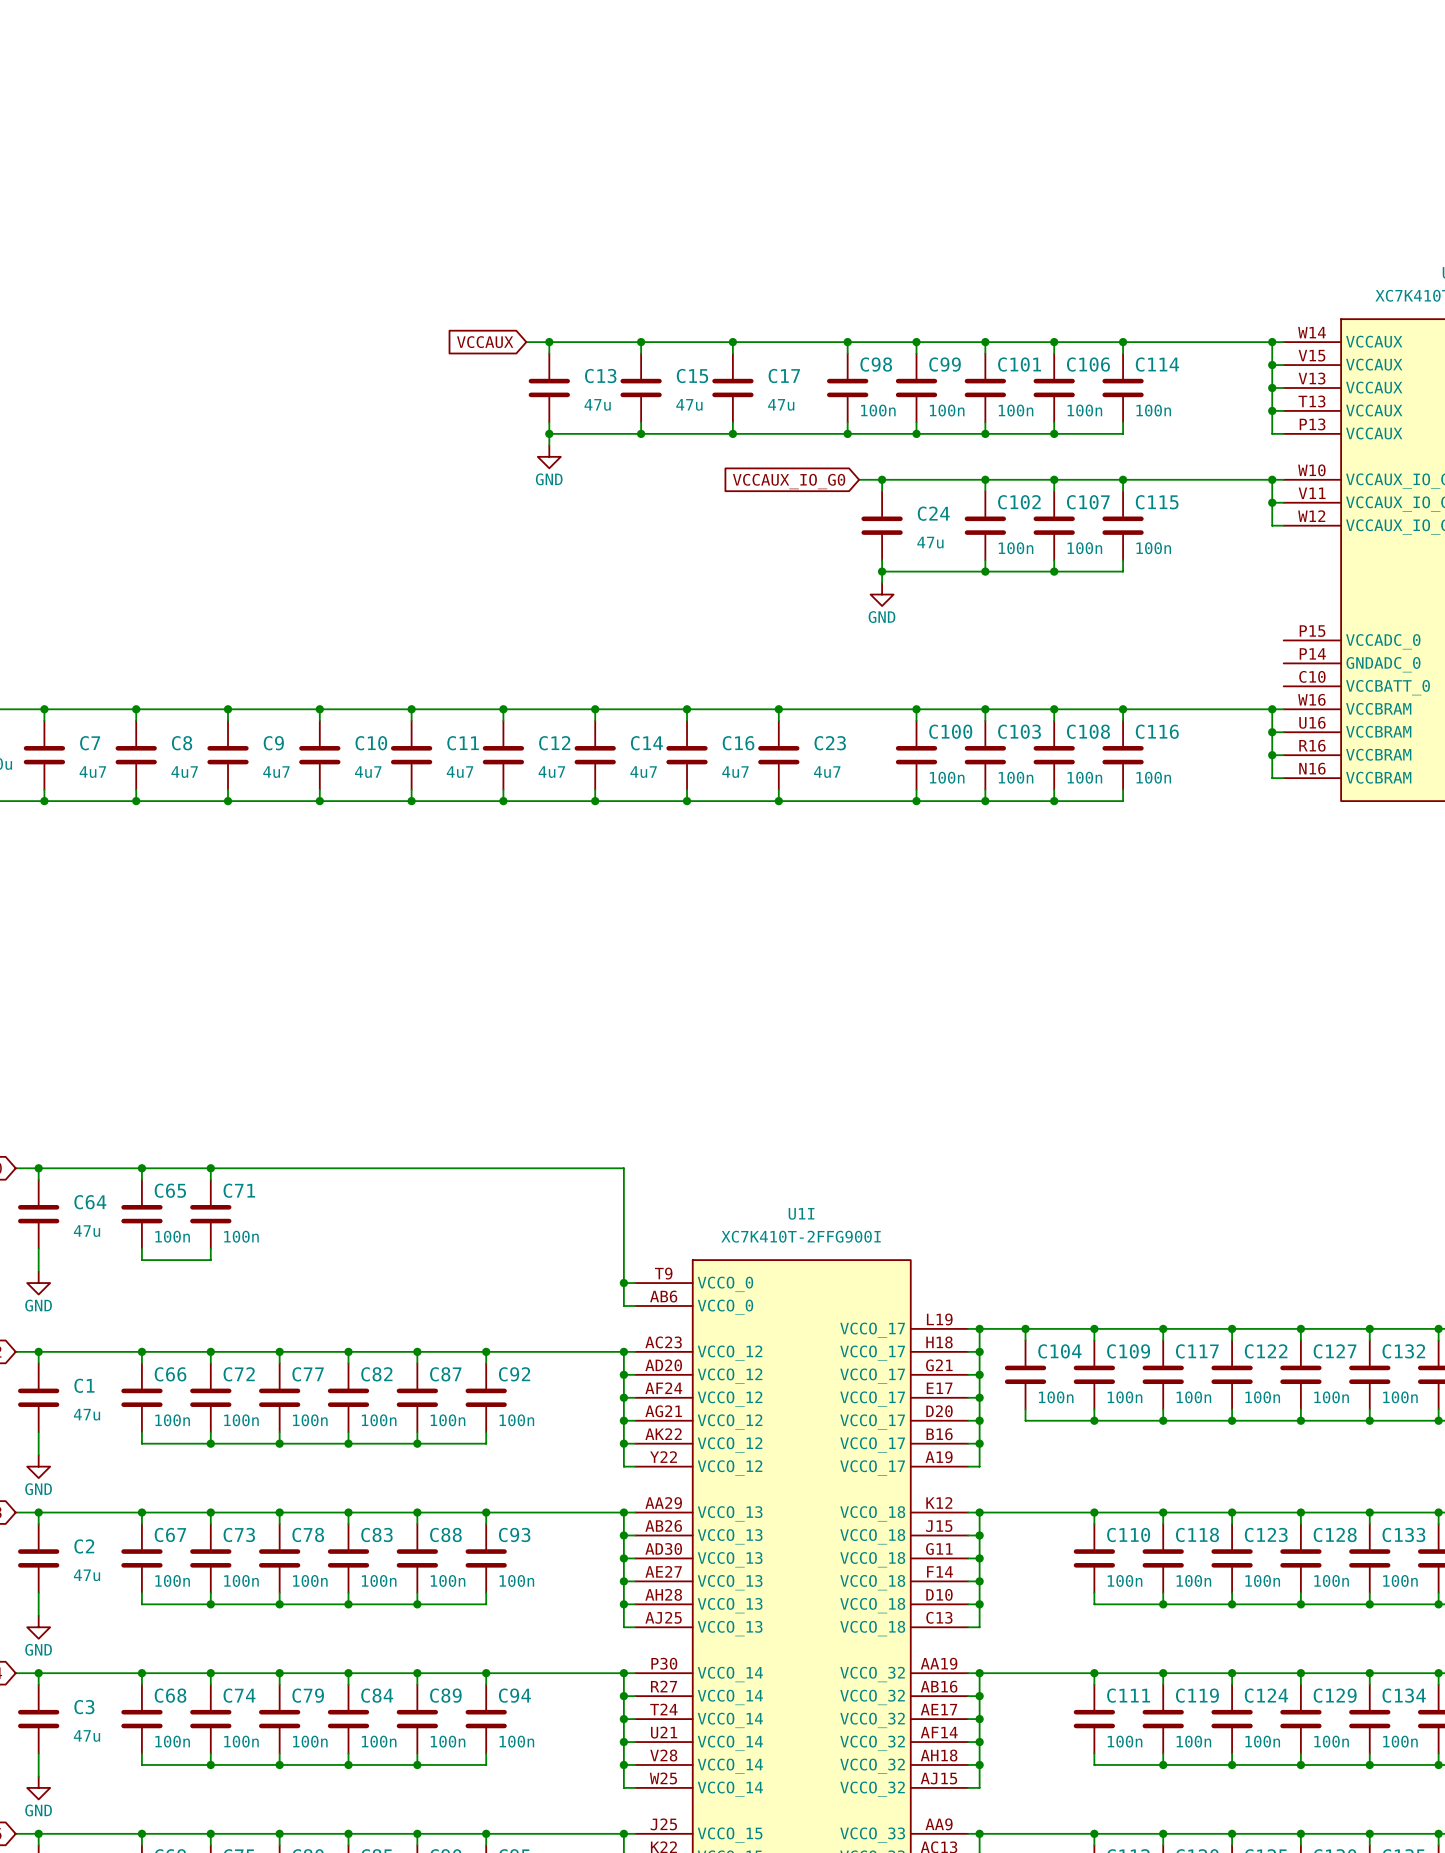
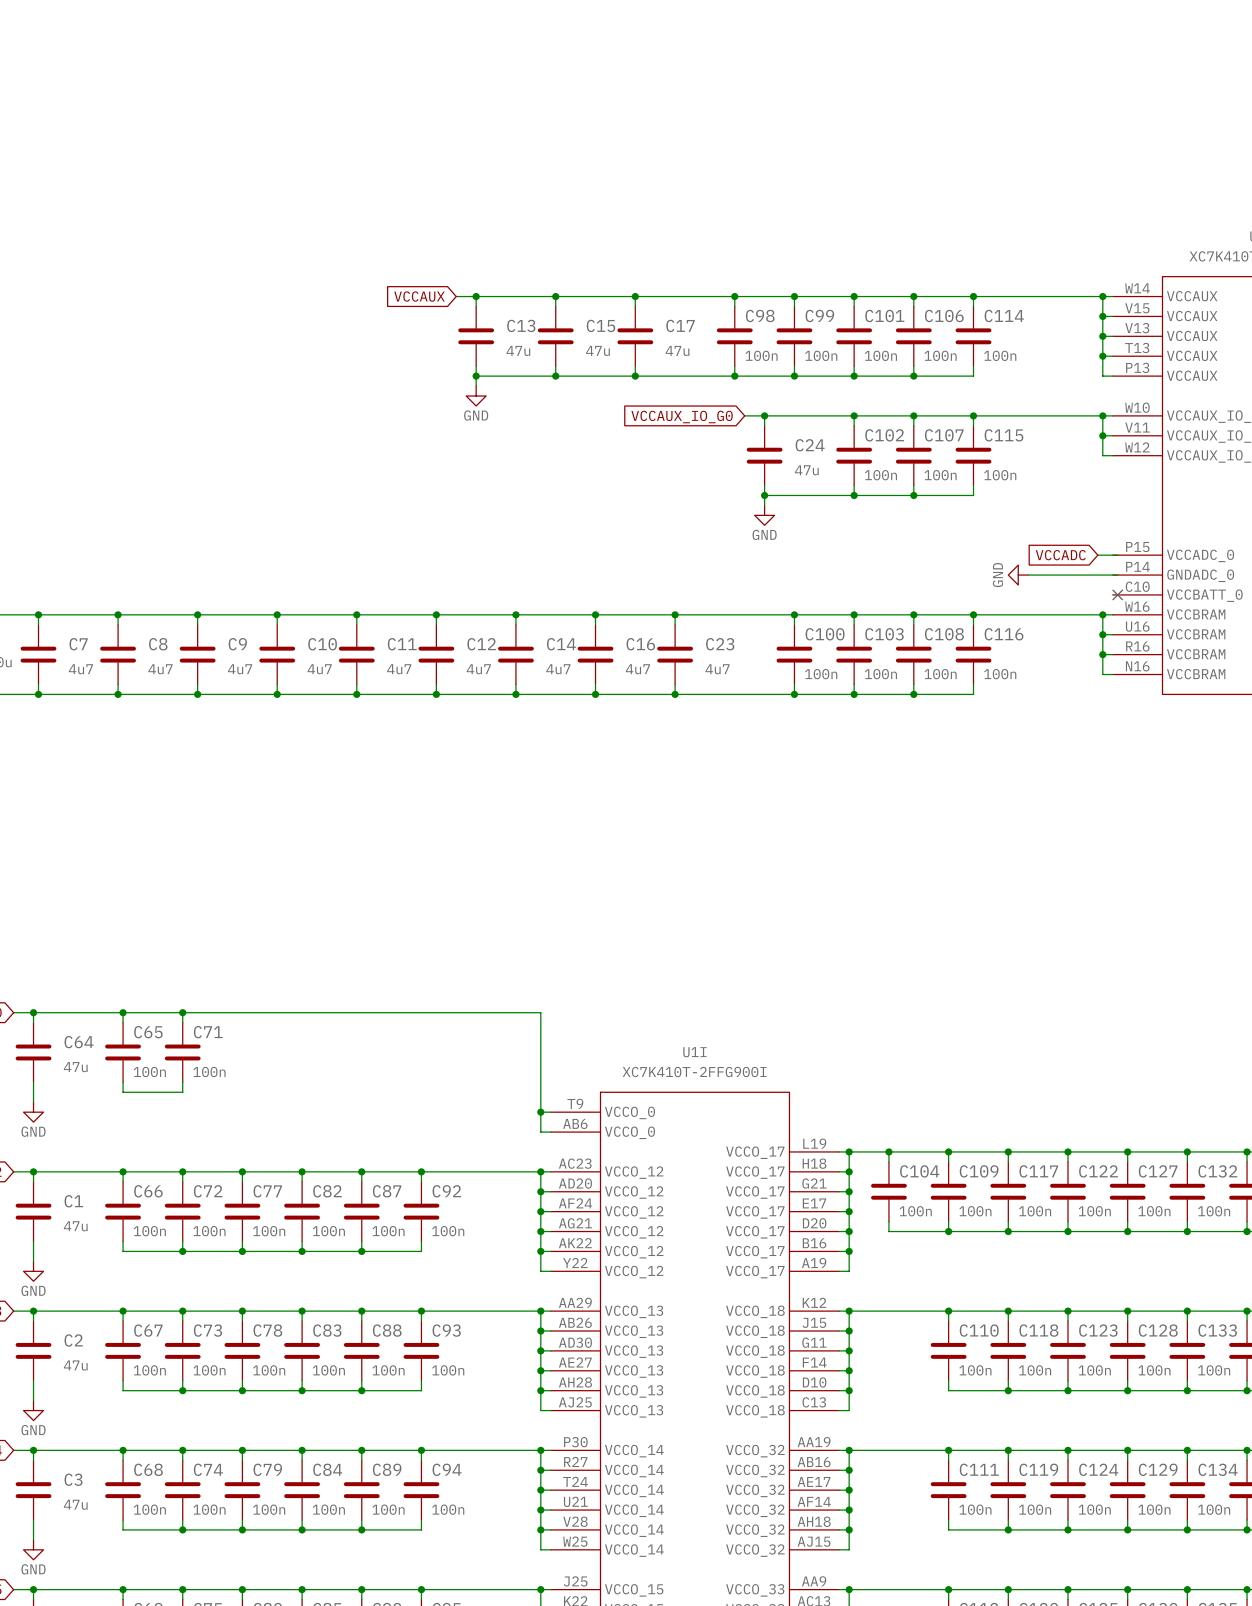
global label: none -> VCCADC (1060, 555)
wire: none -> (1097, 555) (1117, 555)
power symbol: none -> GND (1018, 575)
wire: none -> (1028, 575) (1117, 575)
no-connect mark: none -> (1117, 594)

